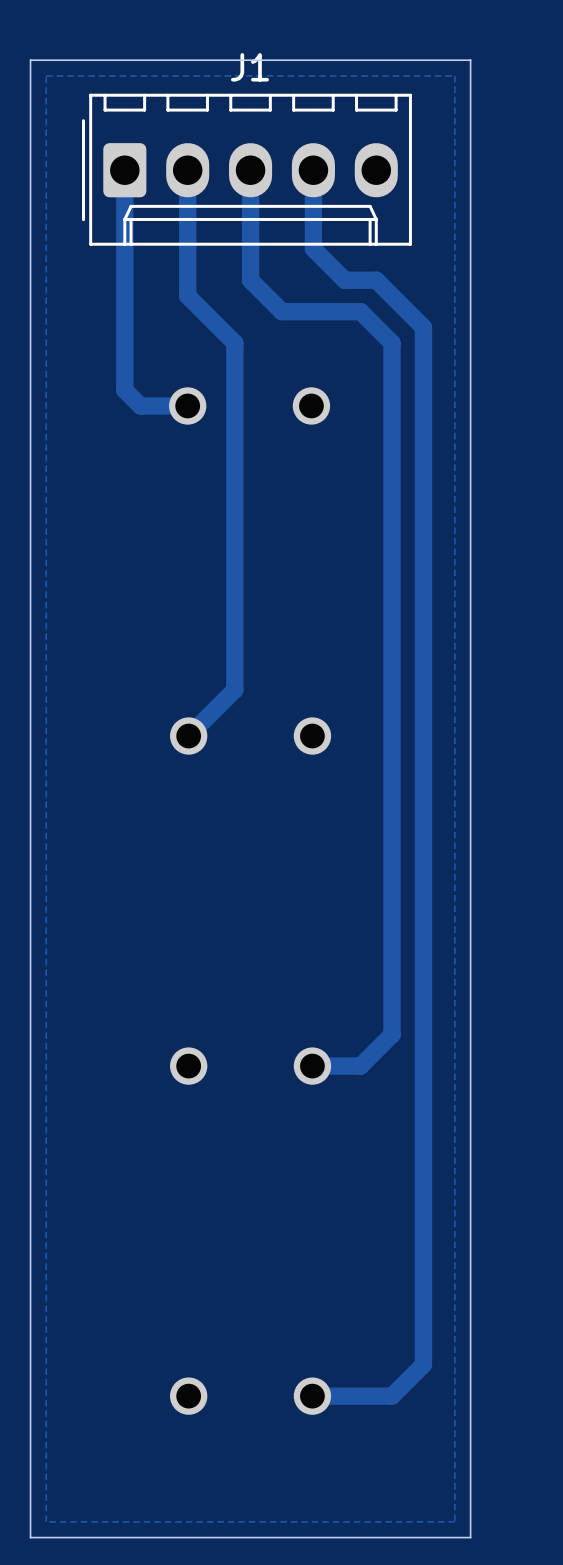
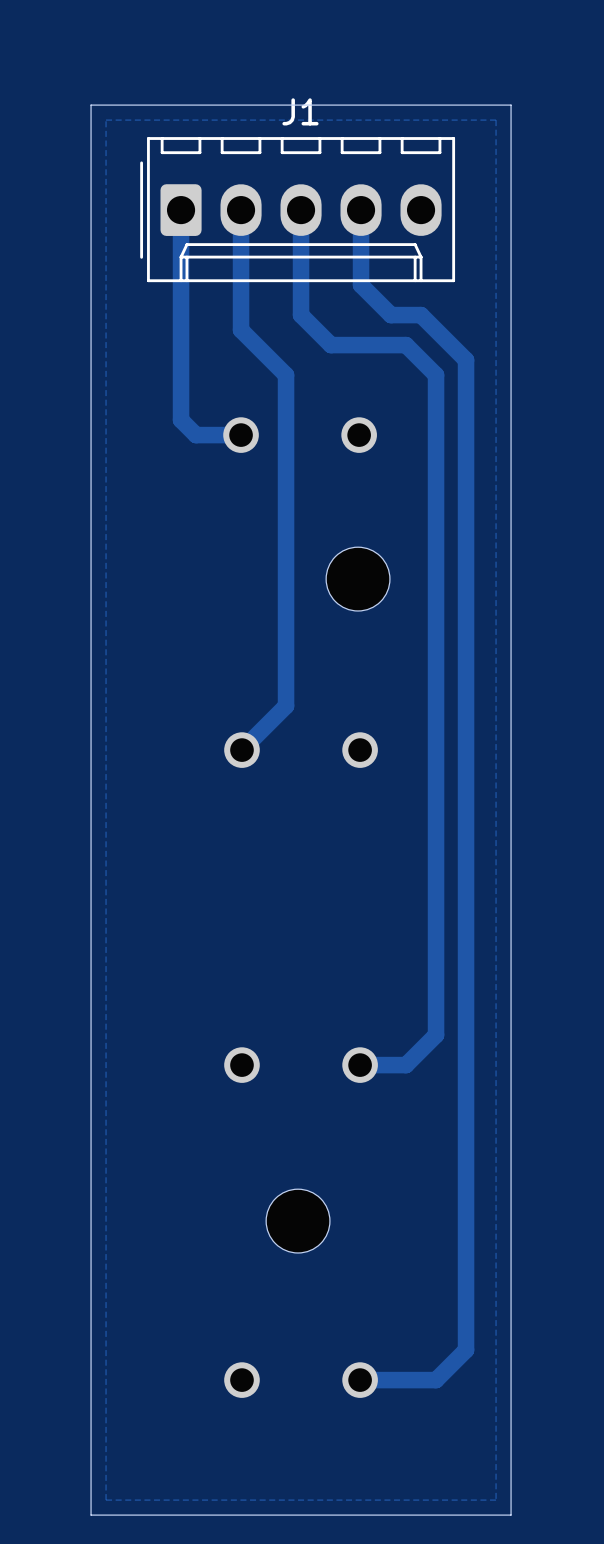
part: none -> (358, 579)
part: none -> (298, 1221)

